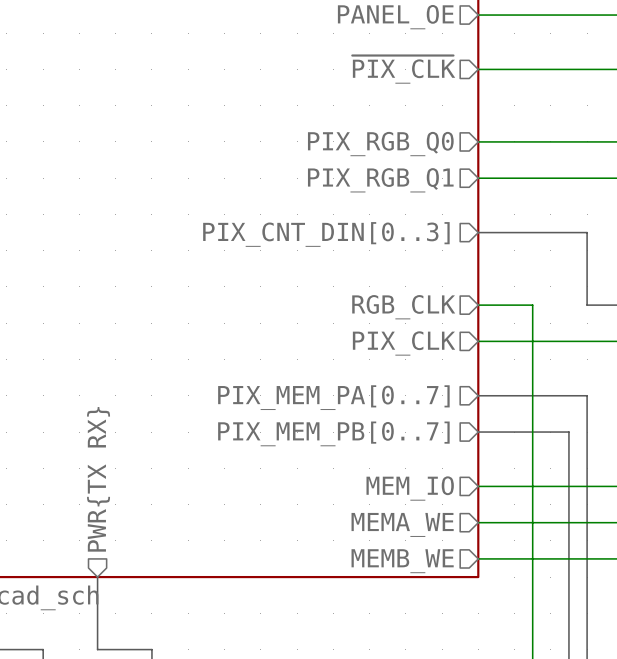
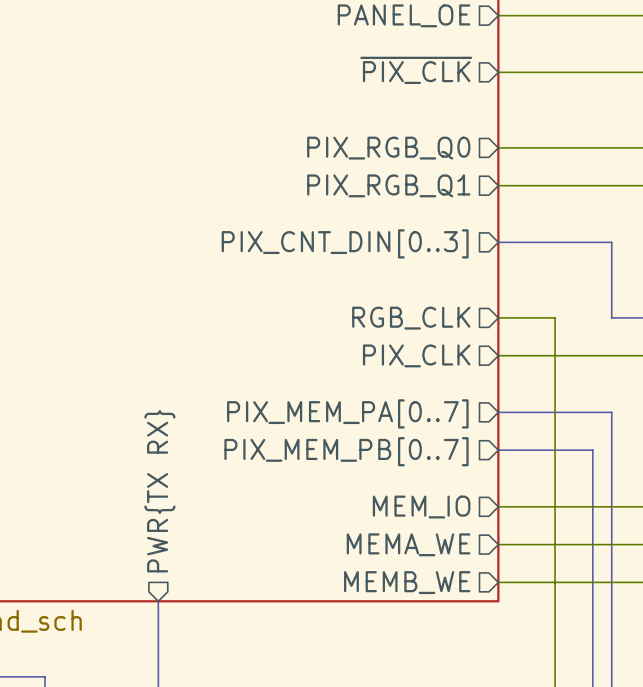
sheet pin position: PWR{TX RX} (98, 479) -> PWR{TX RX} (159, 491)
bus: (97, 577) (97, 649) (151, 649) -> (158, 601) (158, 676)

